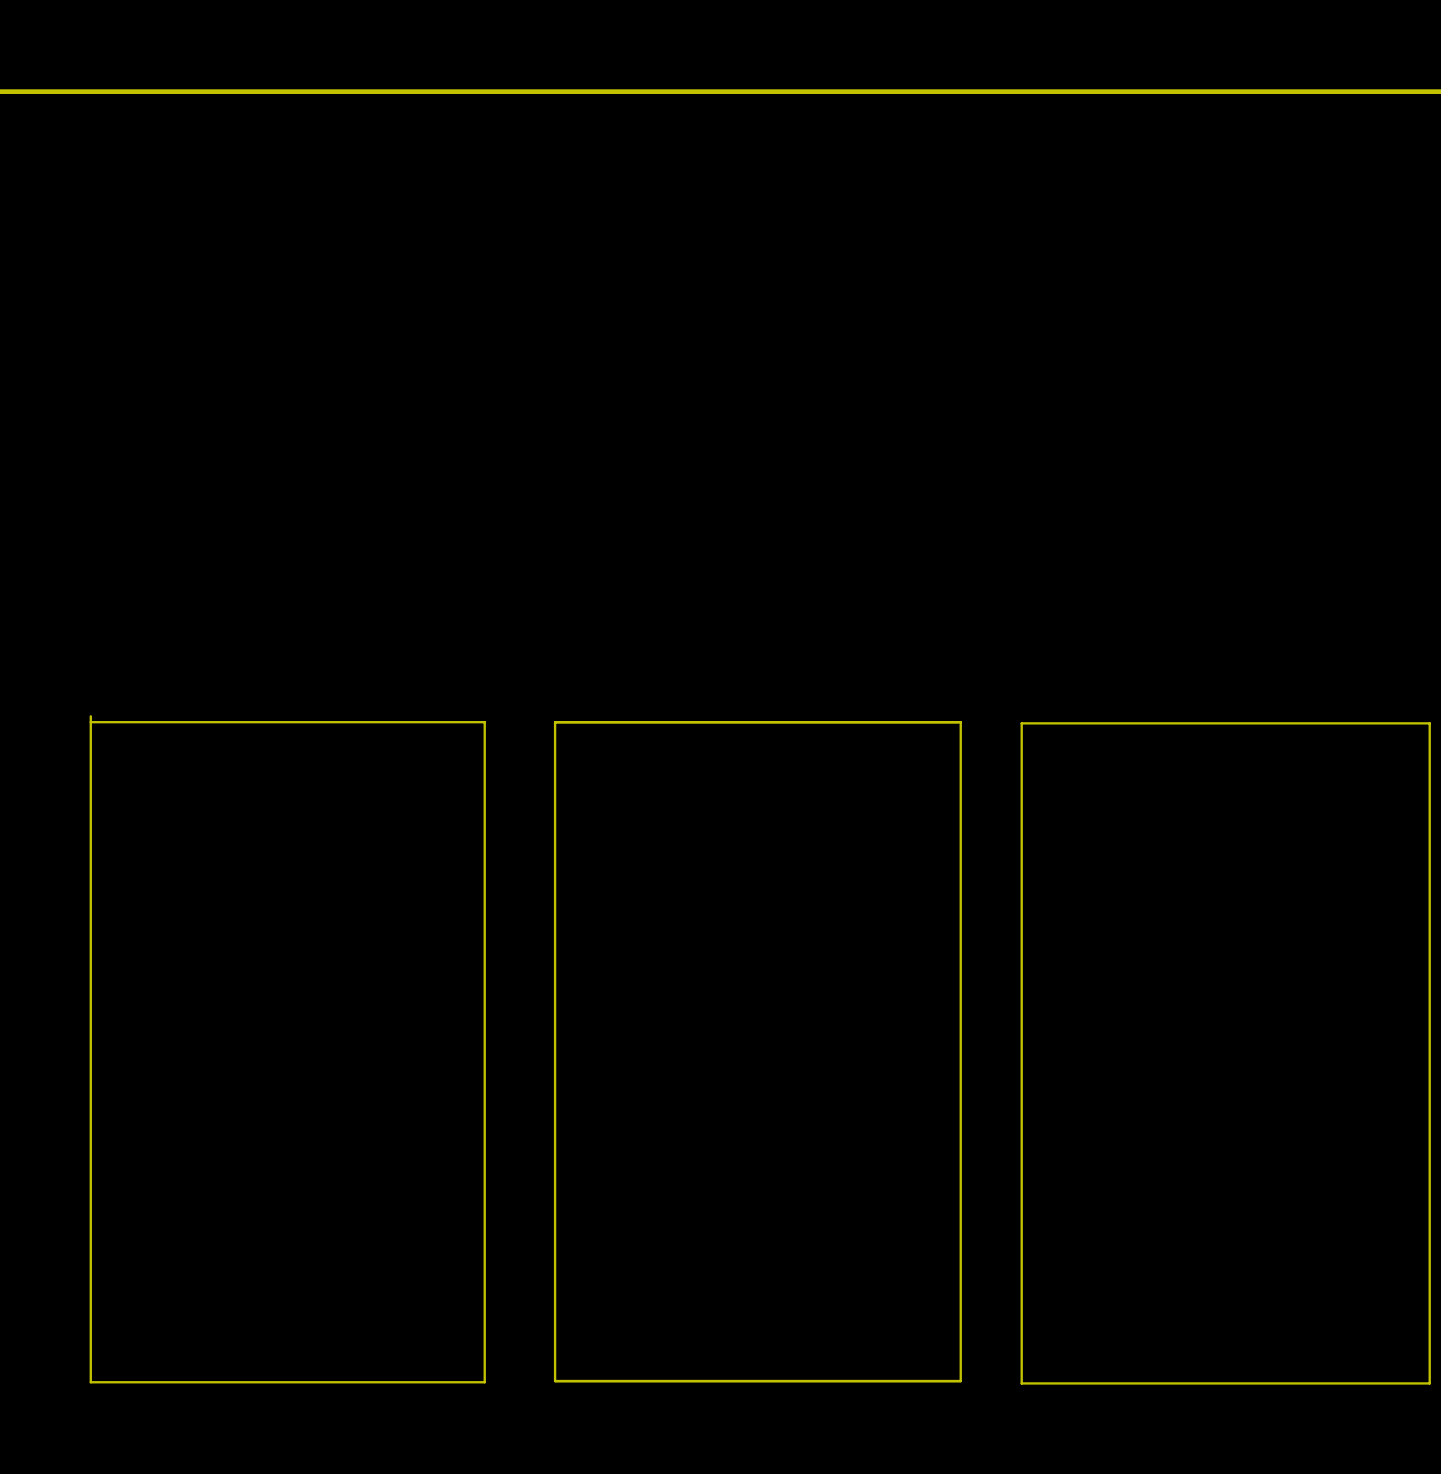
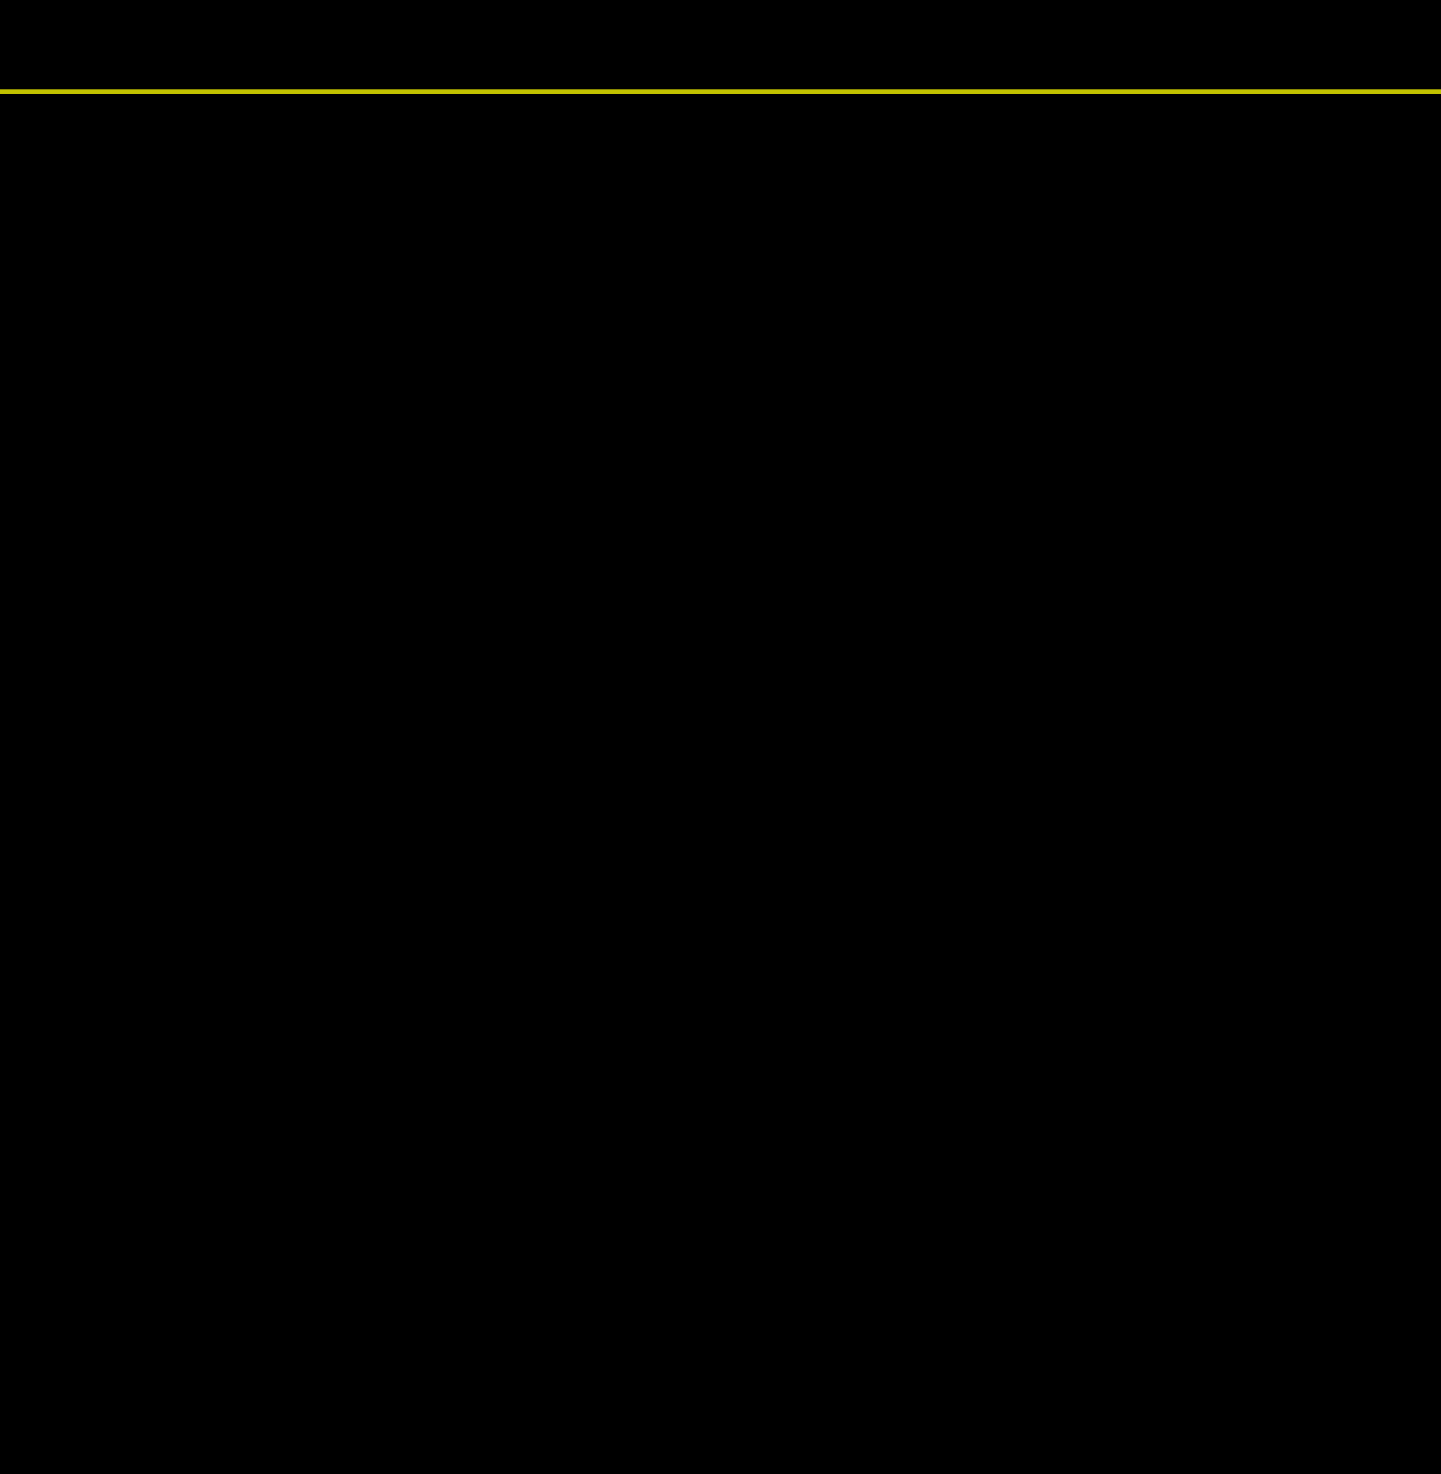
board edge: (90, 716) (90, 1382) (484, 1382) (484, 722) (90, 722) -> none
board edge: (960, 722) (555, 722) (555, 1381) (960, 1381) (960, 722) -> none
board edge: (1429, 723) (1021, 723) (1021, 1383) (1429, 1383) (1429, 723) -> none

